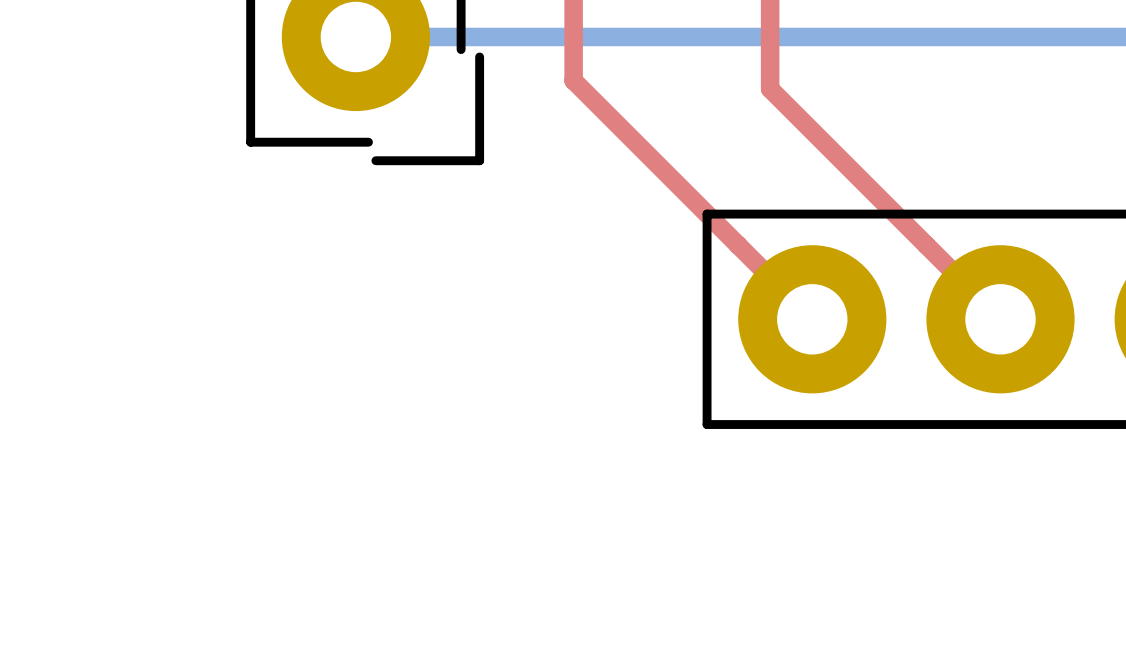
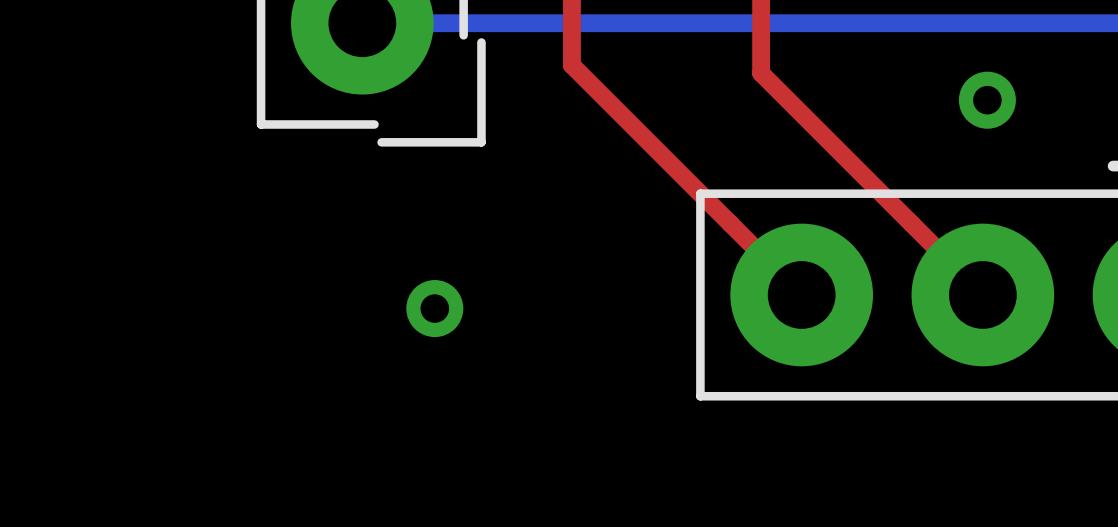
via: none -> (987, 100)
via: none -> (434, 308)

